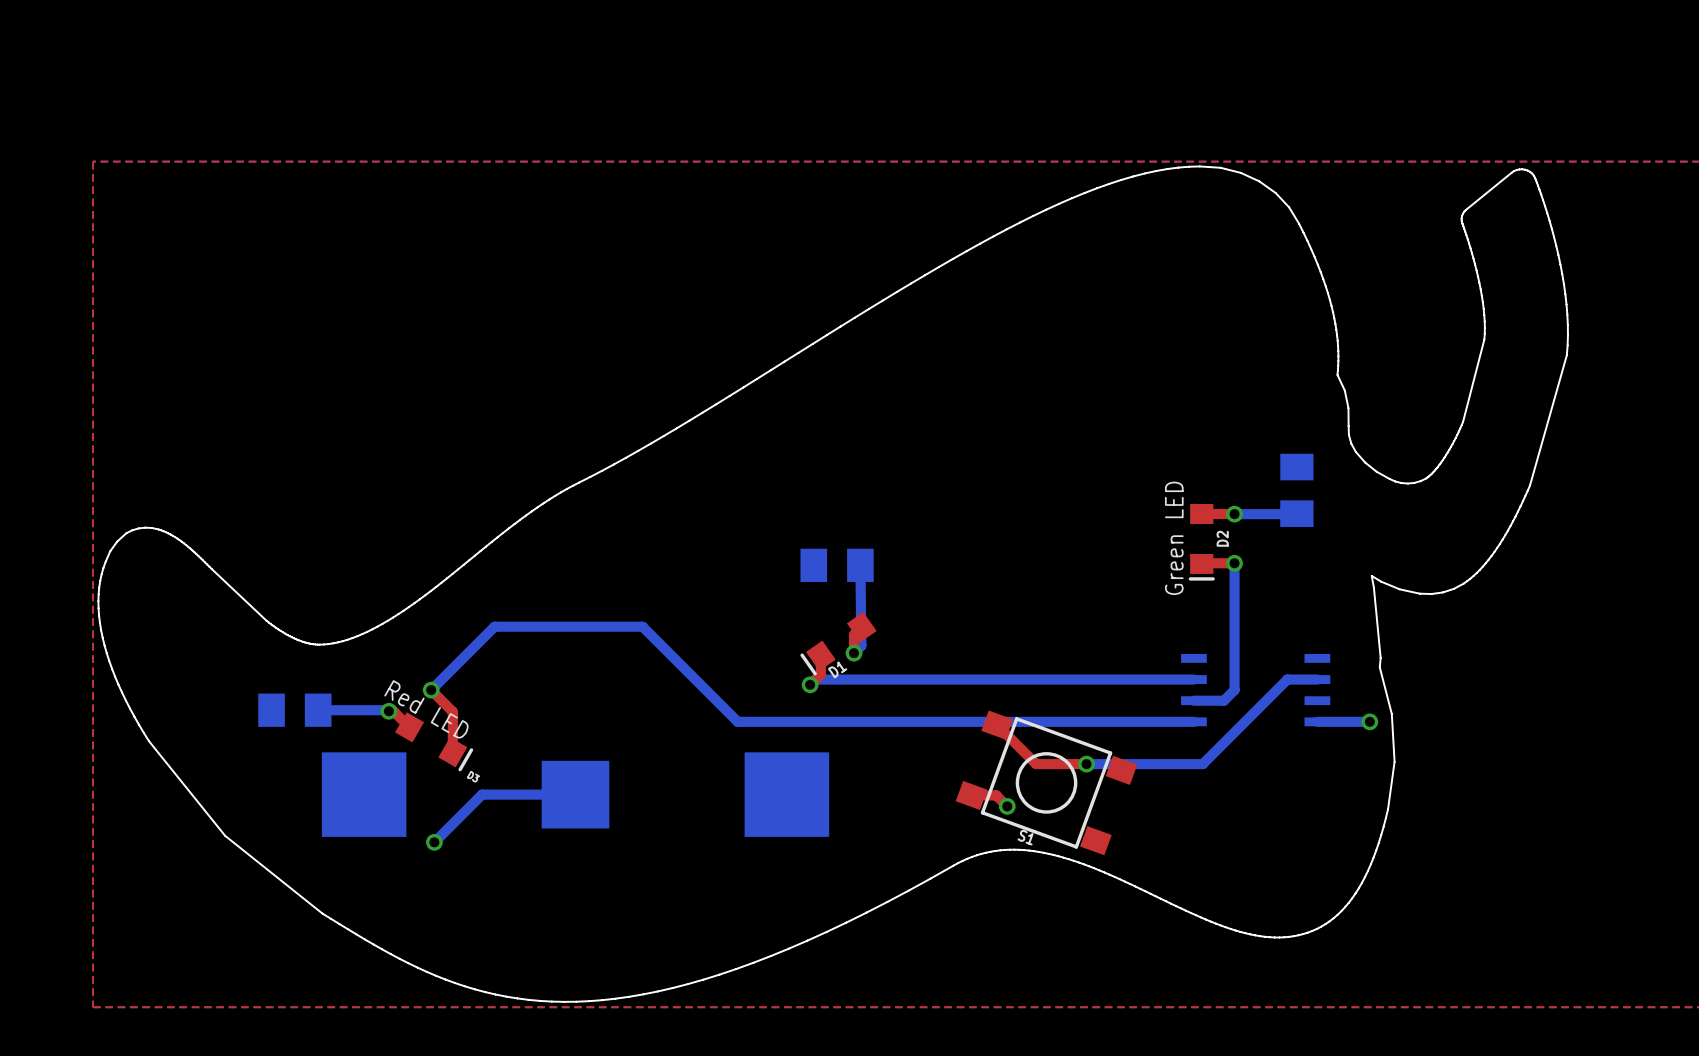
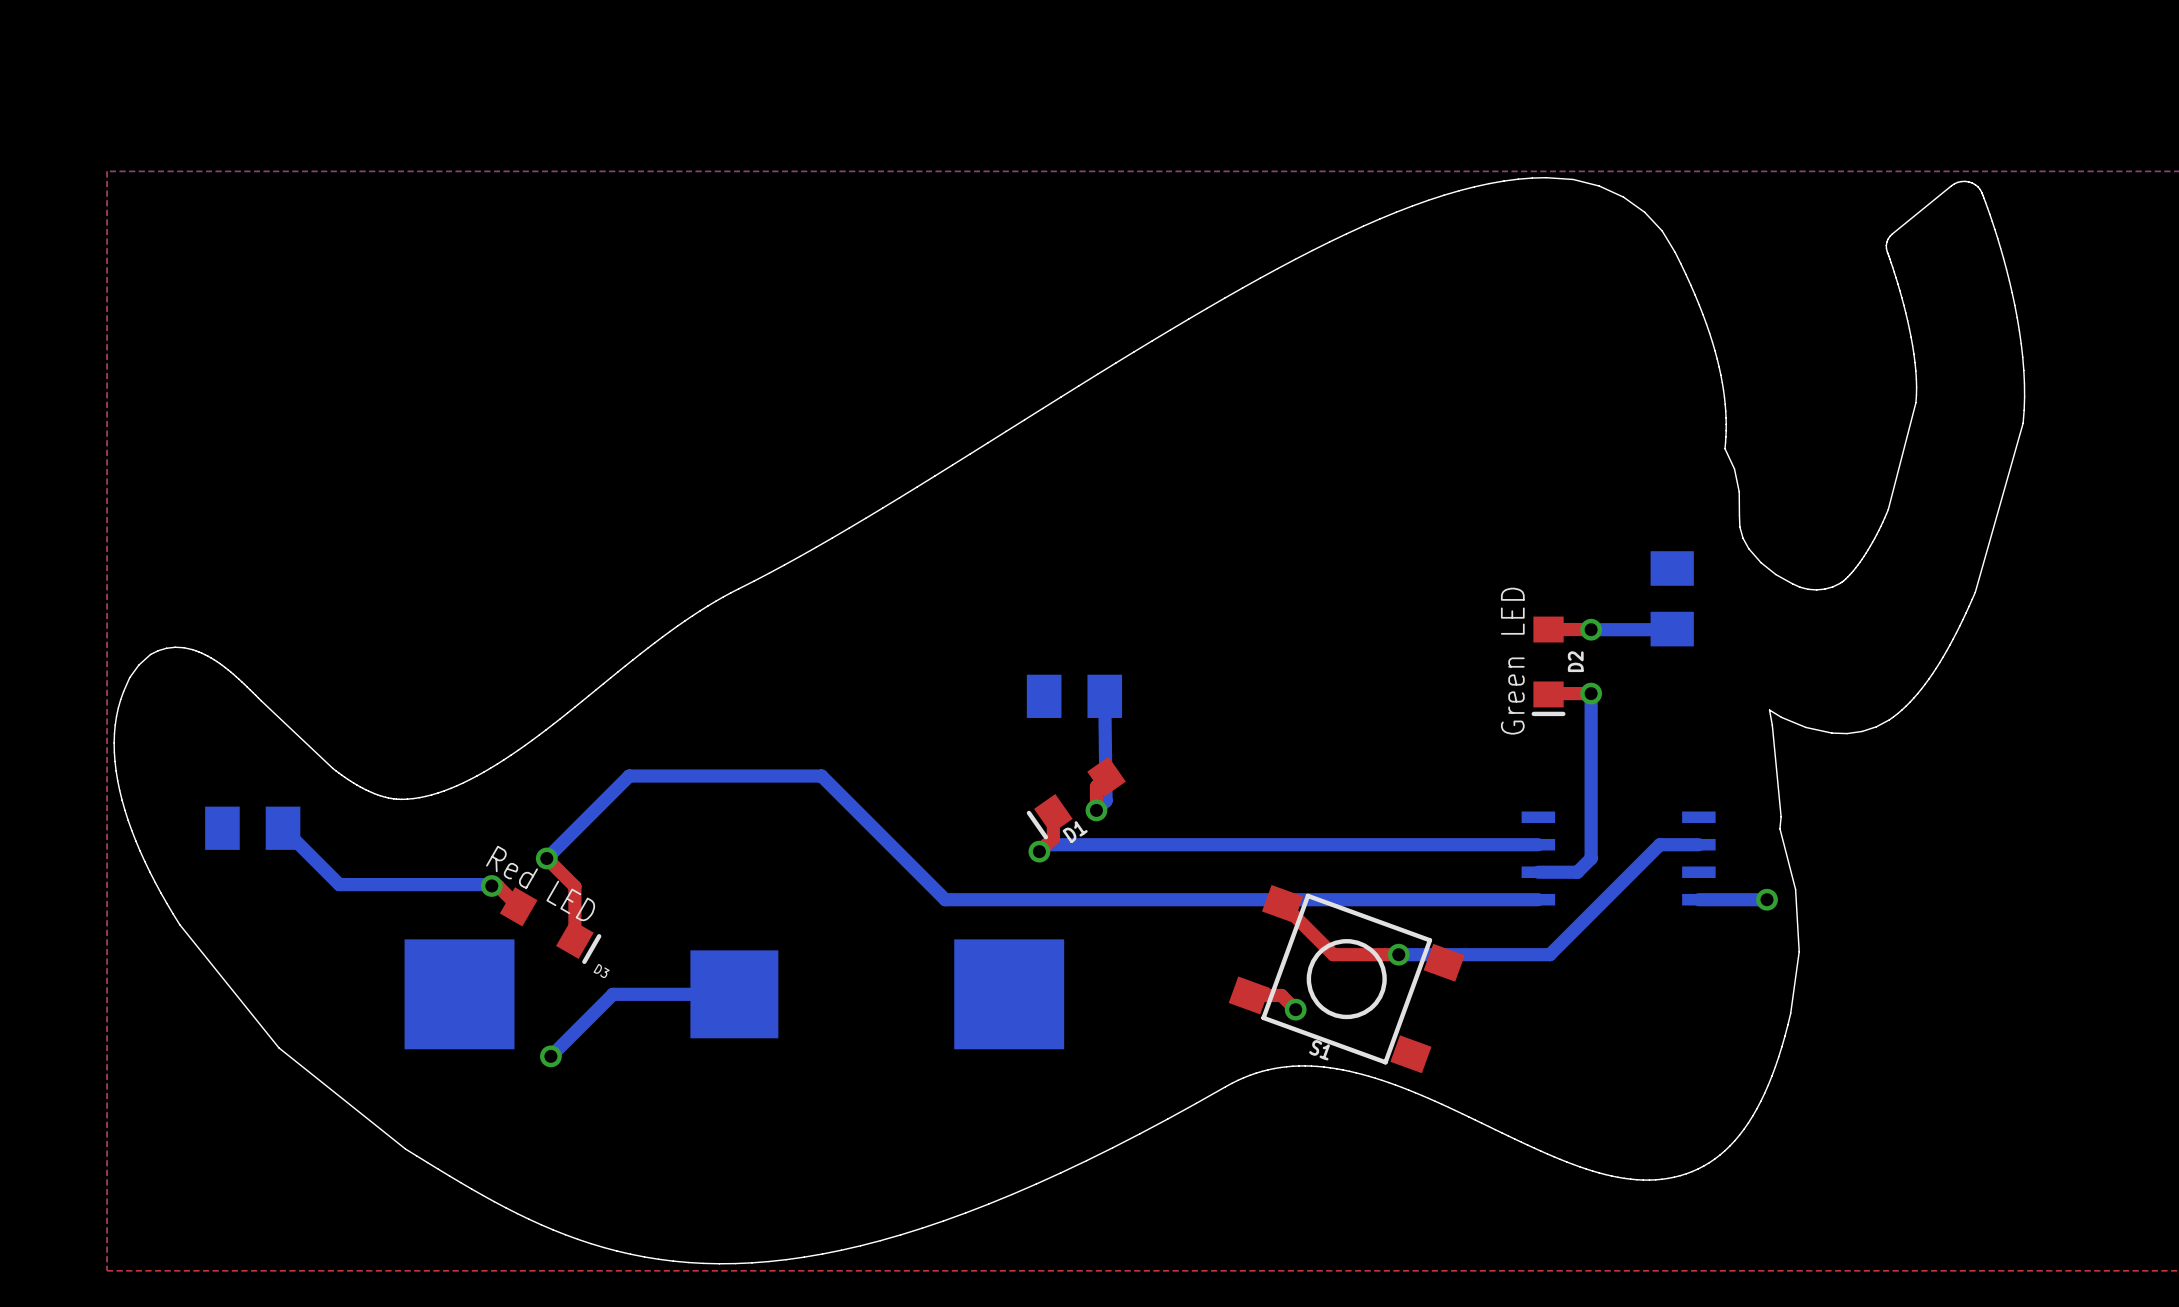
bottom track: none -> (283, 828) (339, 884) (399, 884)
part position: (294, 710) -> (252, 828)

